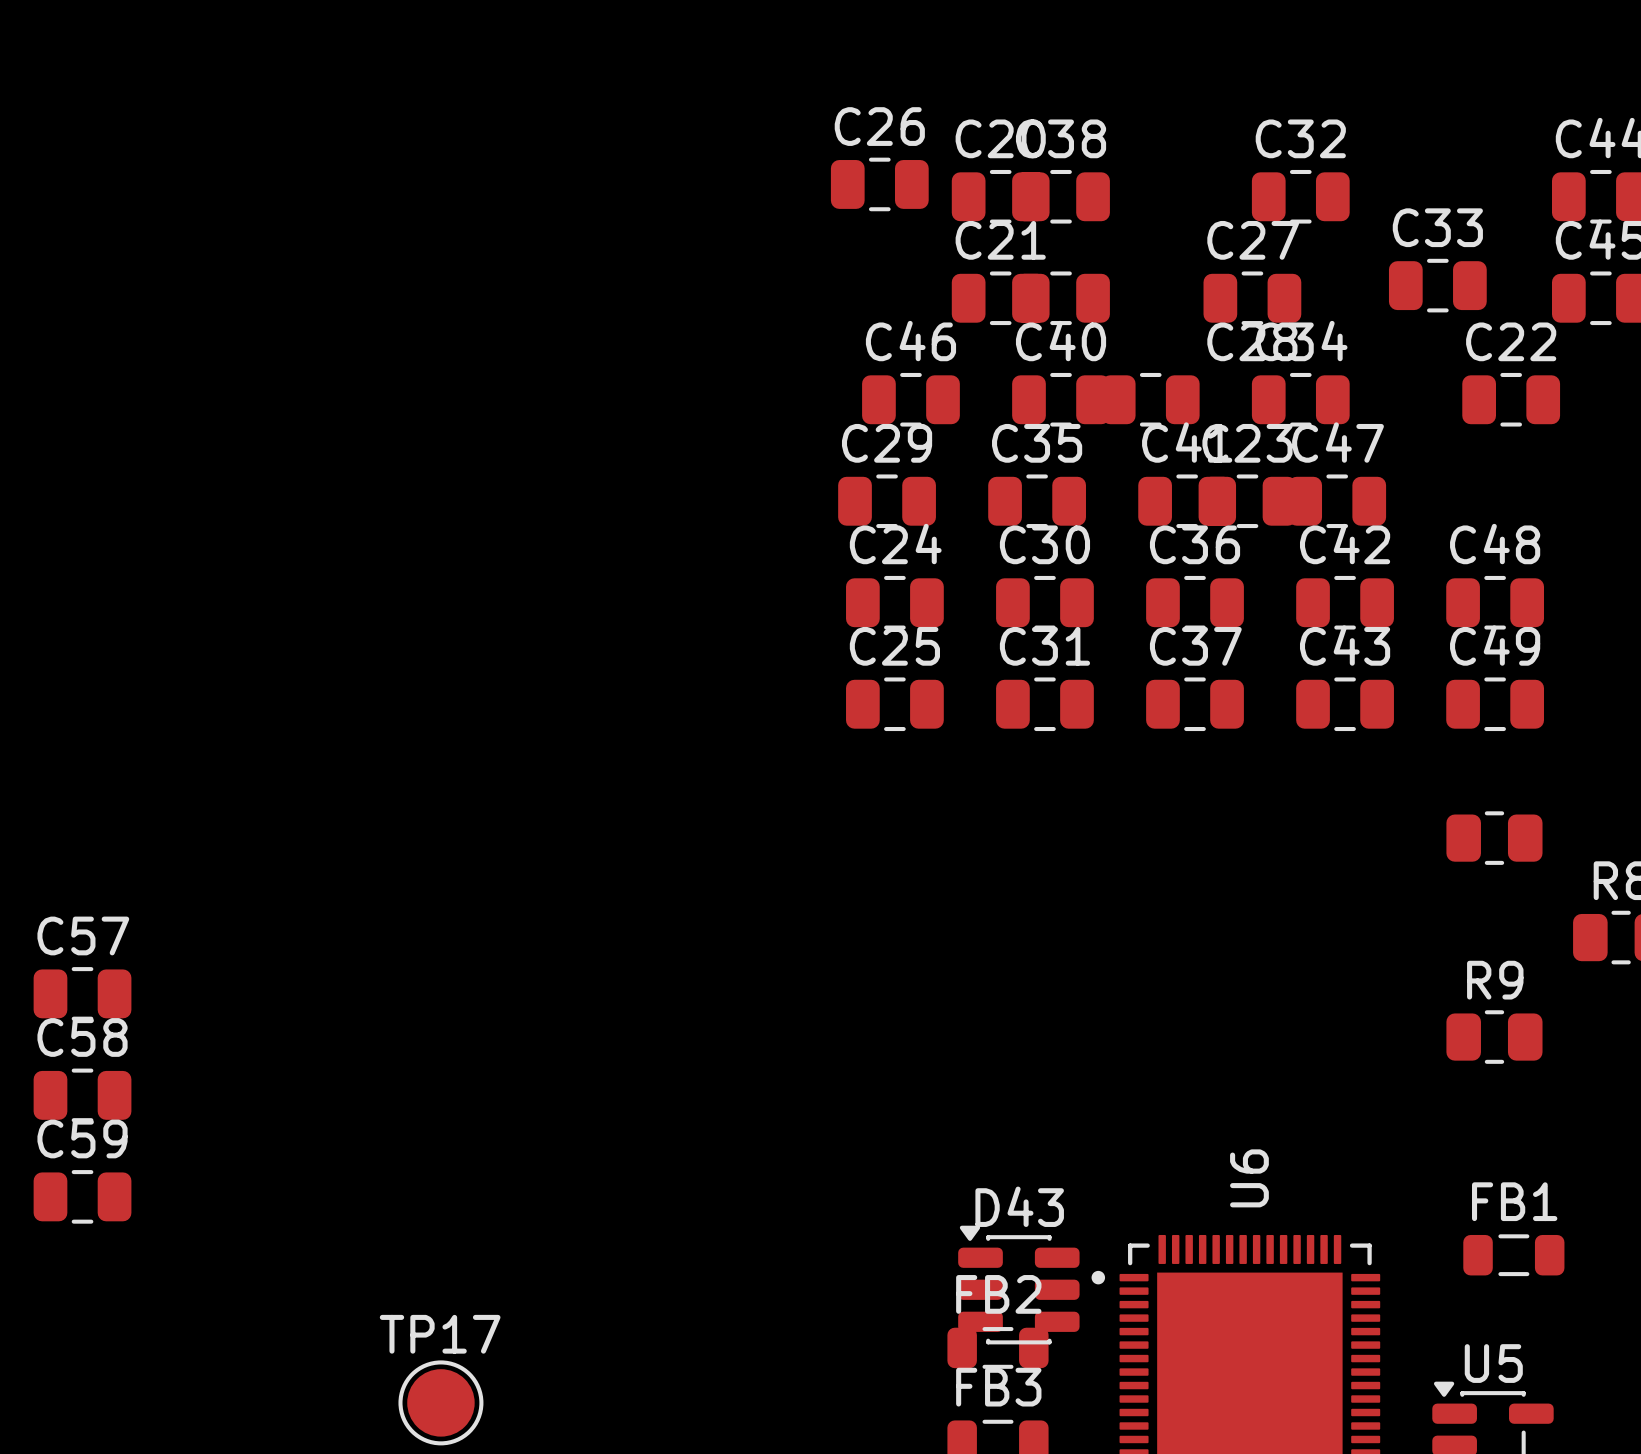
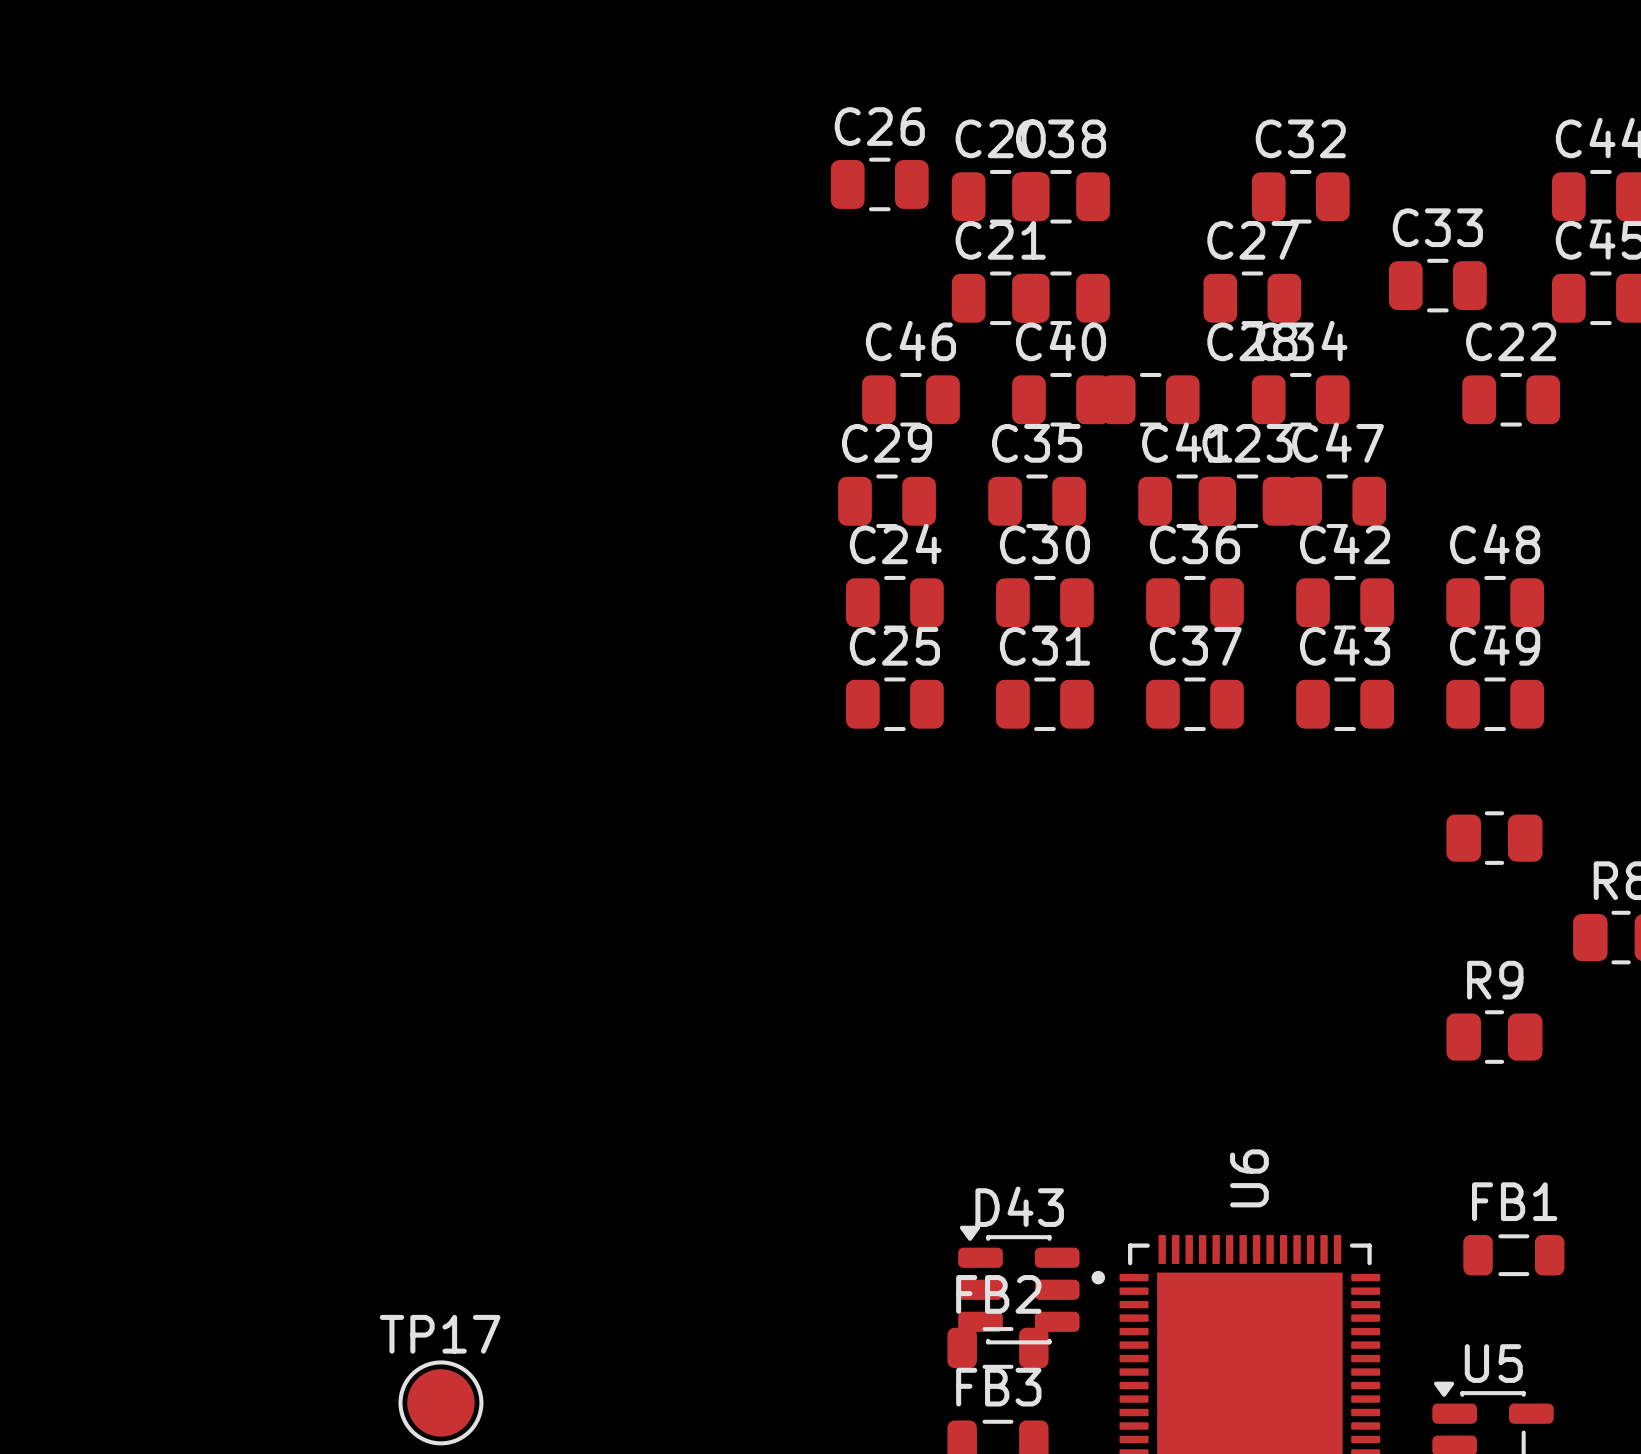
C57: (82, 993) -> none
C58: (82, 1095) -> none
C59: (82, 1196) -> none

